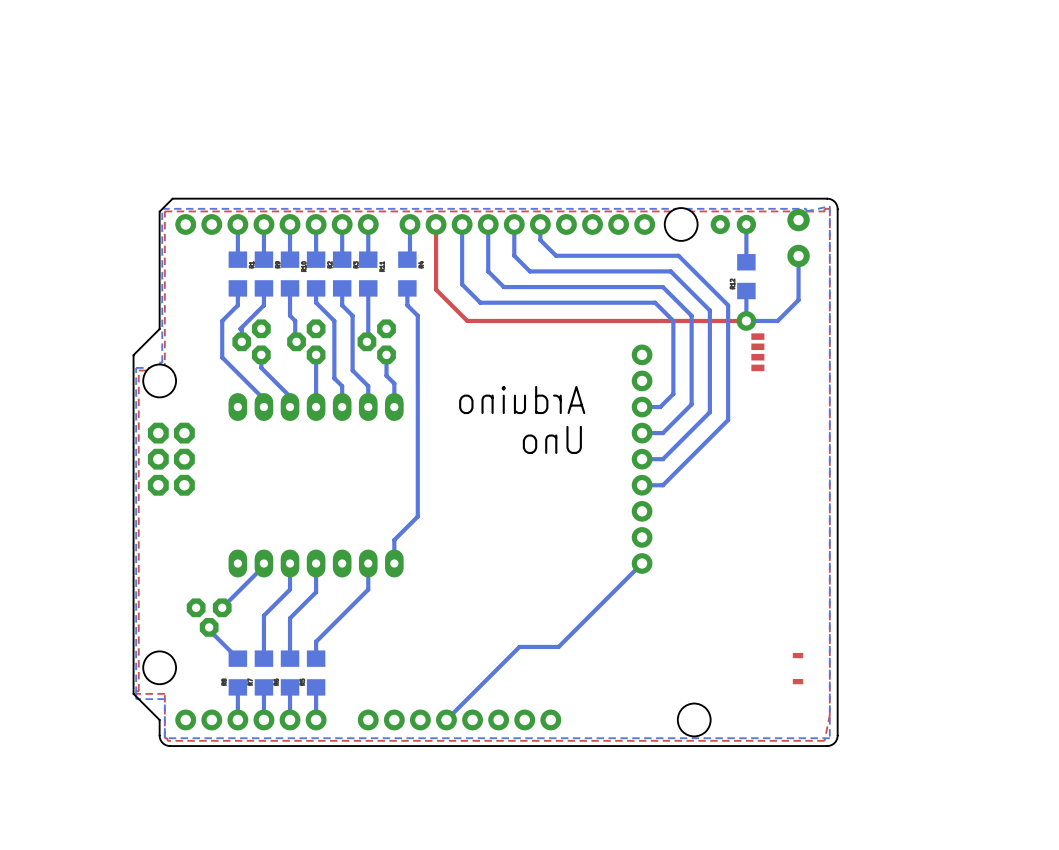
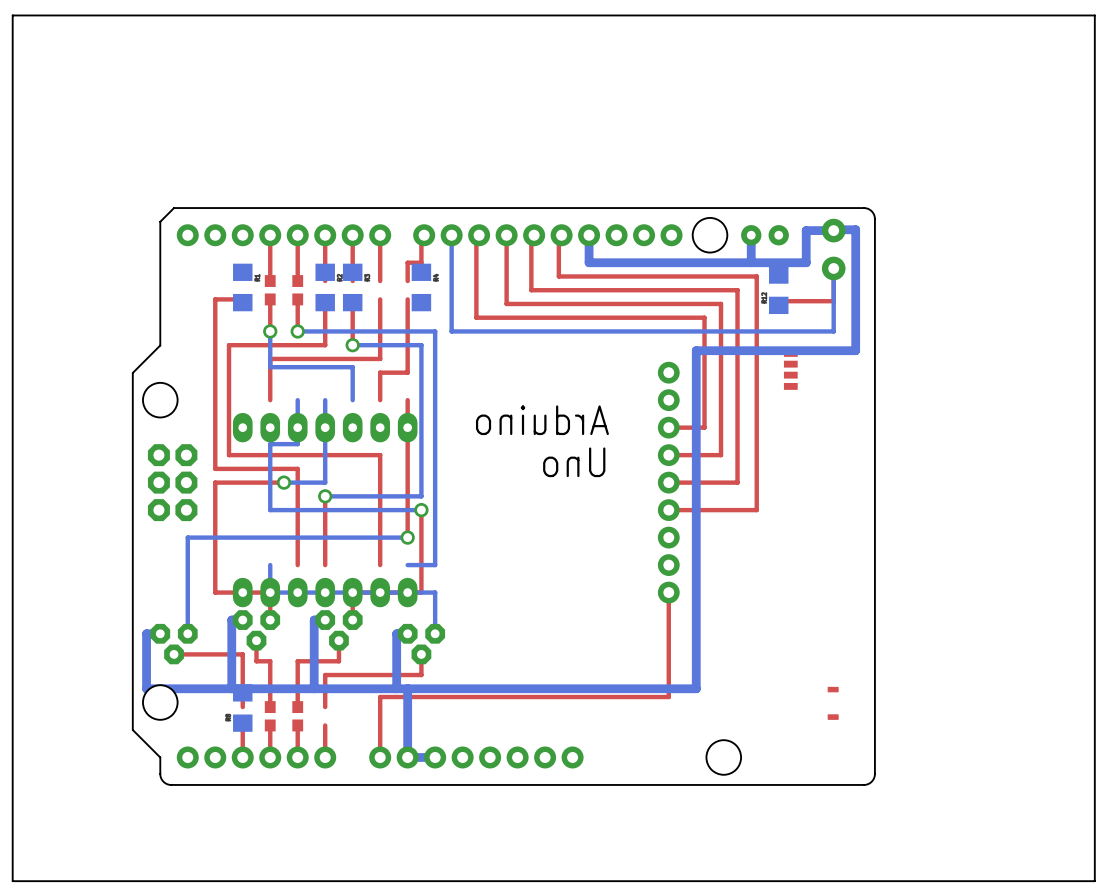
board edge: none -> (1094, 15) (12, 15) (12, 881) (1094, 881) (1094, 15)
bottom zone outline: (829, 206) (829, 738) (164, 738) (164, 699) (136, 699) (136, 367) (159, 367) (159, 362) (162, 362) (162, 208) (806, 208) (806, 211) (829, 206) -> none
top zone outline: (829, 208) (824, 208) (824, 211) (164, 211) (164, 370) (138, 370) (138, 691) (136, 691) (136, 693) (164, 693) (164, 738) (167, 738) (167, 740) (824, 740) (829, 714) (829, 208) -> none
bottom track: (237, 224) (237, 259) -> none
top track: none -> (270, 235) (270, 281)
bottom track: (263, 224) (263, 259) -> none
top track: none -> (297, 235) (297, 281)
bottom track: (290, 224) (290, 259) -> none
top track: none -> (325, 235) (325, 281)
bottom track: (316, 224) (316, 259) -> none
top track: none -> (352, 235) (352, 281)
bottom track: (342, 224) (342, 259) -> none
top track: none -> (380, 235) (380, 281)
bottom track: (368, 224) (368, 263) -> none
top track: none -> (424, 235) (421, 235) (421, 262) (407, 262) (407, 281)
bottom track: (409, 224) (409, 258) (407, 259) -> none
top track: (436, 224) (436, 289) (467, 320) (746, 320) -> none
top track: none -> (479, 235) (476, 235) (476, 317) (704, 317) (704, 427) (668, 427)
bottom track: (462, 224) (462, 284) (480, 302) (655, 302) (673, 320) (673, 393) (660, 407) (642, 407) -> none
top track: none -> (506, 235) (506, 303) (721, 303) (721, 455) (668, 455)
bottom track: (488, 224) (488, 271) (503, 287) (662, 287) (691, 315) (691, 404) (662, 433) (642, 433) -> none
top track: none -> (534, 235) (531, 235) (531, 290) (737, 290) (737, 482) (668, 482)
bottom track: (514, 224) (514, 255) (529, 271) (670, 271) (709, 310) (709, 412) (662, 459) (642, 459) -> none
top track: none -> (561, 235) (558, 235) (558, 276) (756, 276) (756, 510) (668, 510)
bottom track: (540, 224) (540, 240) (556, 255) (678, 255) (728, 305) (728, 420) (662, 485) (642, 485) -> none
bottom track: none -> (586, 235) (589, 235) (589, 262) (806, 262) (806, 230) (855, 229) (855, 350) (696, 350) (696, 688) (146, 688) (146, 633) (160, 633)
bottom track: none -> (751, 235) (751, 262)
bottom track: (746, 224) (746, 262) -> none
top track: none -> (833, 268) (833, 301) (778, 301) (778, 299)
part: (263, 274) -> none
part: (290, 274) -> none
part: (368, 274) -> none
part: none -> (270, 290)
part: none -> (297, 290)
top track: none -> (242, 299) (215, 299) (215, 468) (297, 468) (297, 565)
top track: none -> (270, 299) (270, 331)
top track: none -> (297, 299) (297, 331)
top track: none -> (325, 299) (325, 345) (229, 345) (229, 455) (380, 455) (380, 565)
top track: none -> (352, 299) (352, 345)
top track: none -> (380, 299) (380, 358) (270, 358) (270, 400)
top track: none -> (407, 299) (407, 372) (380, 372) (380, 400)
bottom track: (237, 288) (237, 305) (222, 320) (222, 357) (263, 399) (263, 407) -> none
bottom track: (263, 288) (263, 305) (240, 328) (241, 341) -> none
bottom track: (290, 288) (290, 315) (295, 320) (296, 341) -> none
bottom track: (316, 288) (316, 302) (334, 320) (334, 378) (342, 386) (342, 407) -> none
bottom track: (342, 288) (342, 305) (352, 315) (352, 370) (368, 386) (368, 407) -> none
bottom track: (368, 288) (366, 341) -> none
bottom track: (407, 288) (407, 305) (417, 315) (417, 516) (394, 540) (394, 563) -> none
bottom track: (746, 291) (746, 320) (777, 320) (798, 300) -> (451, 235) (451, 331) (833, 331) (833, 314)
bottom track: none -> (270, 331) (270, 367) (352, 367) (352, 400)
via: none -> (270, 331)
bottom track: none -> (297, 331) (435, 331) (435, 565) (407, 565)
via: none -> (297, 331)
via: (746, 320) -> none
bottom track: none -> (352, 345) (421, 345) (421, 496) (325, 496)
via: none -> (352, 345)
part: (251, 341) -> none
part: (306, 341) -> none
part: (376, 341) -> none
bottom track: (261, 354) (261, 367) (290, 396) -> (297, 400) (297, 416)
bottom track: (316, 354) (316, 380) -> none
bottom track: (386, 354) (386, 375) (394, 383) (394, 407) -> none
top track: none -> (407, 400) (407, 537)
bottom track: none -> (297, 427) (297, 444) (270, 444) (270, 510) (421, 510)
bottom track: none -> (325, 427) (325, 482) (283, 482)
top track: none -> (283, 482) (215, 482) (215, 592) (270, 592) (270, 620)
via: none -> (283, 482)
top track: none -> (325, 496) (325, 565)
via: none -> (325, 496)
top track: none -> (421, 510) (421, 592) (352, 592) (352, 620)
via: none -> (421, 510)
bottom track: none -> (407, 537) (187, 537) (187, 633)
via: none -> (407, 537)
bottom track: none -> (270, 565) (270, 592) (435, 592) (435, 633)
bottom track: (263, 563) (263, 566) (222, 607) -> none
bottom track: (290, 563) (290, 589) (263, 615) (263, 658) -> none
bottom track: (316, 563) (316, 592) (290, 618) (290, 658) -> none
bottom track: (368, 563) (368, 589) (316, 641) (316, 659) -> none
top track: none -> (668, 592) (668, 697) (380, 697) (380, 757)
bottom track: (642, 563) (558, 646) (519, 646) (446, 719) -> none
bottom track: none -> (242, 620) (231, 620) (231, 688)
bottom track: none -> (325, 620) (314, 620) (314, 688)
part: none -> (256, 630)
part: none -> (338, 630)
bottom track: none -> (407, 633) (396, 633) (396, 688)
top track: none -> (256, 640) (256, 661) (270, 661) (270, 707)
top track: none -> (338, 640) (338, 661) (297, 661) (297, 707)
part: none -> (174, 644)
part: none -> (421, 644)
part: (209, 617) -> none
top track: none -> (174, 654) (242, 654) (242, 707)
top track: none -> (421, 654) (421, 675) (325, 675) (325, 707)
bottom track: (209, 627) (209, 629) (237, 658) -> none
bottom track: none -> (407, 688) (407, 757) (435, 757) (435, 760)
part: (263, 673) -> none
part: (290, 673) -> none
part: (316, 673) -> none
part: none -> (270, 716)
part: none -> (297, 716)
bottom track: (237, 687) (237, 719) -> none
bottom track: (263, 687) (263, 719) -> none
bottom track: (290, 687) (290, 719) -> none
bottom track: (316, 687) (316, 719) -> none
top track: none -> (242, 725) (242, 757)
top track: none -> (270, 725) (270, 757)
top track: none -> (297, 725) (297, 757)
top track: none -> (325, 725) (325, 757)

